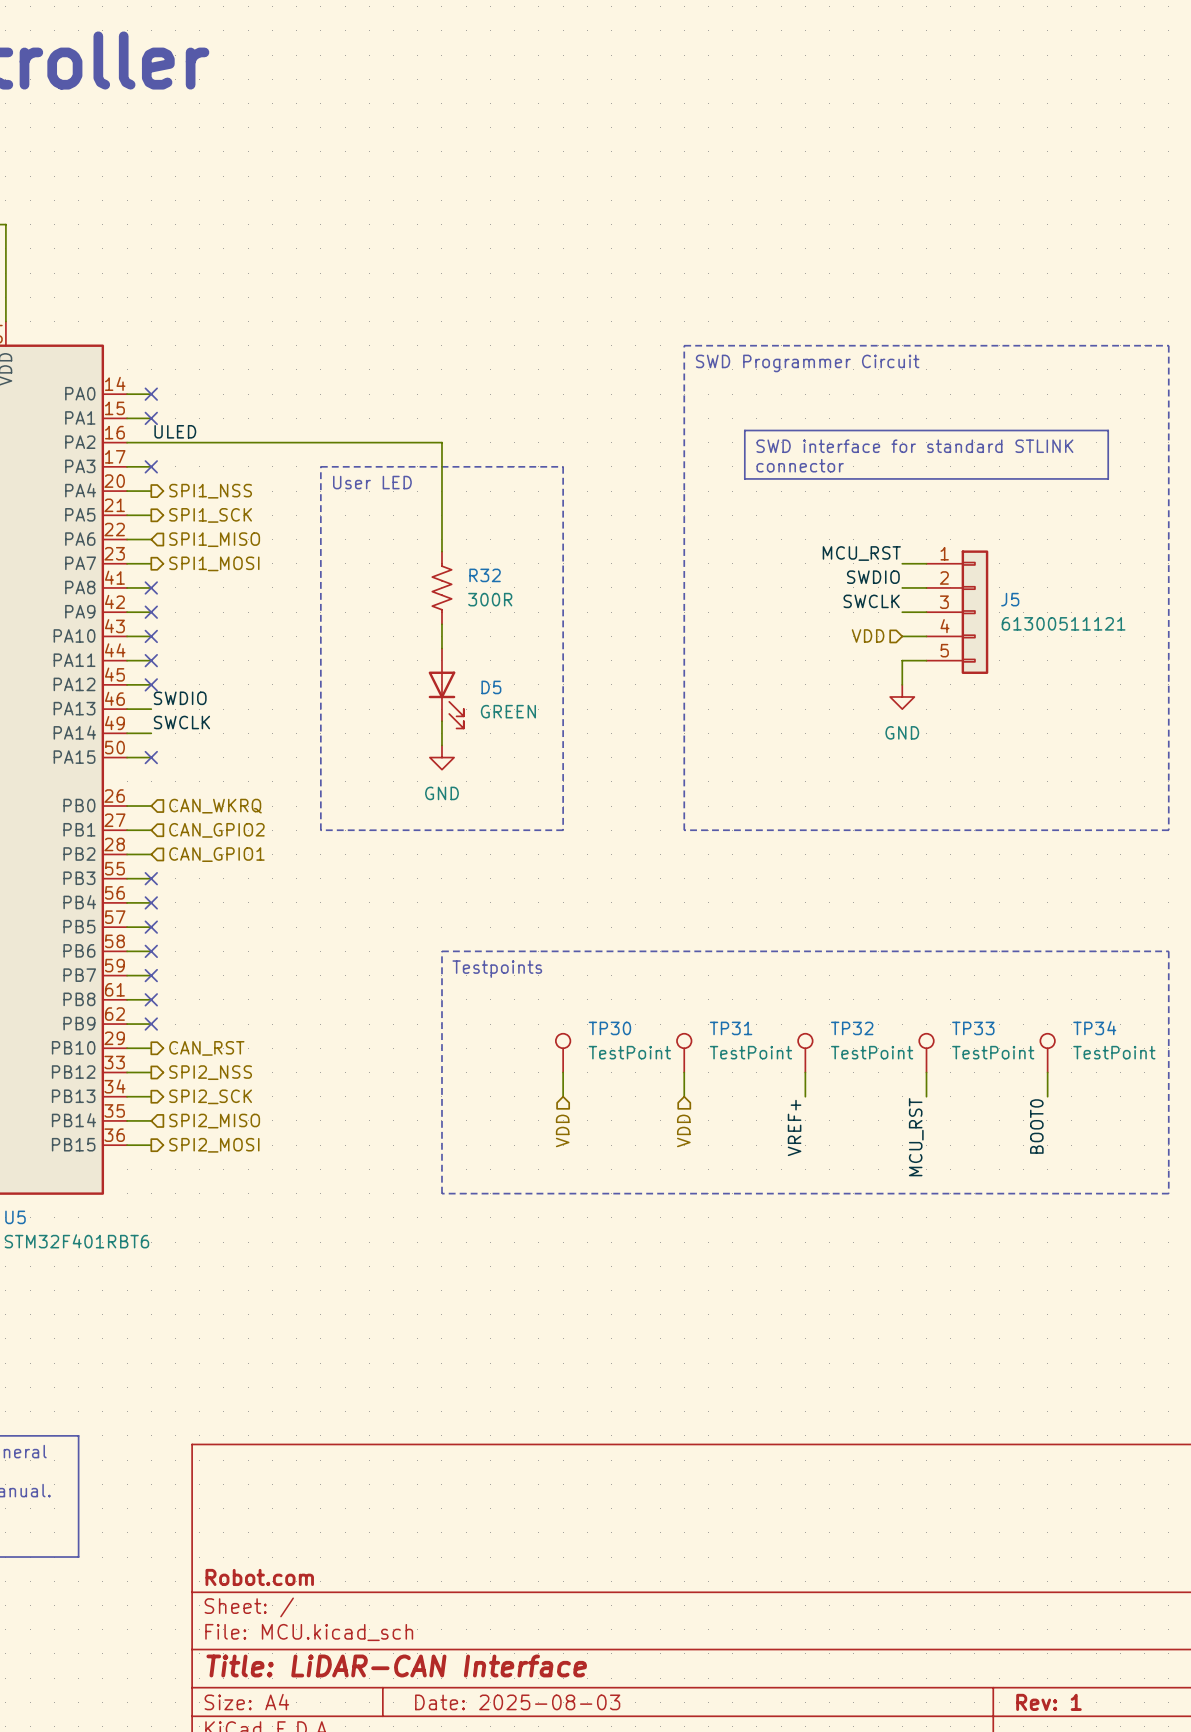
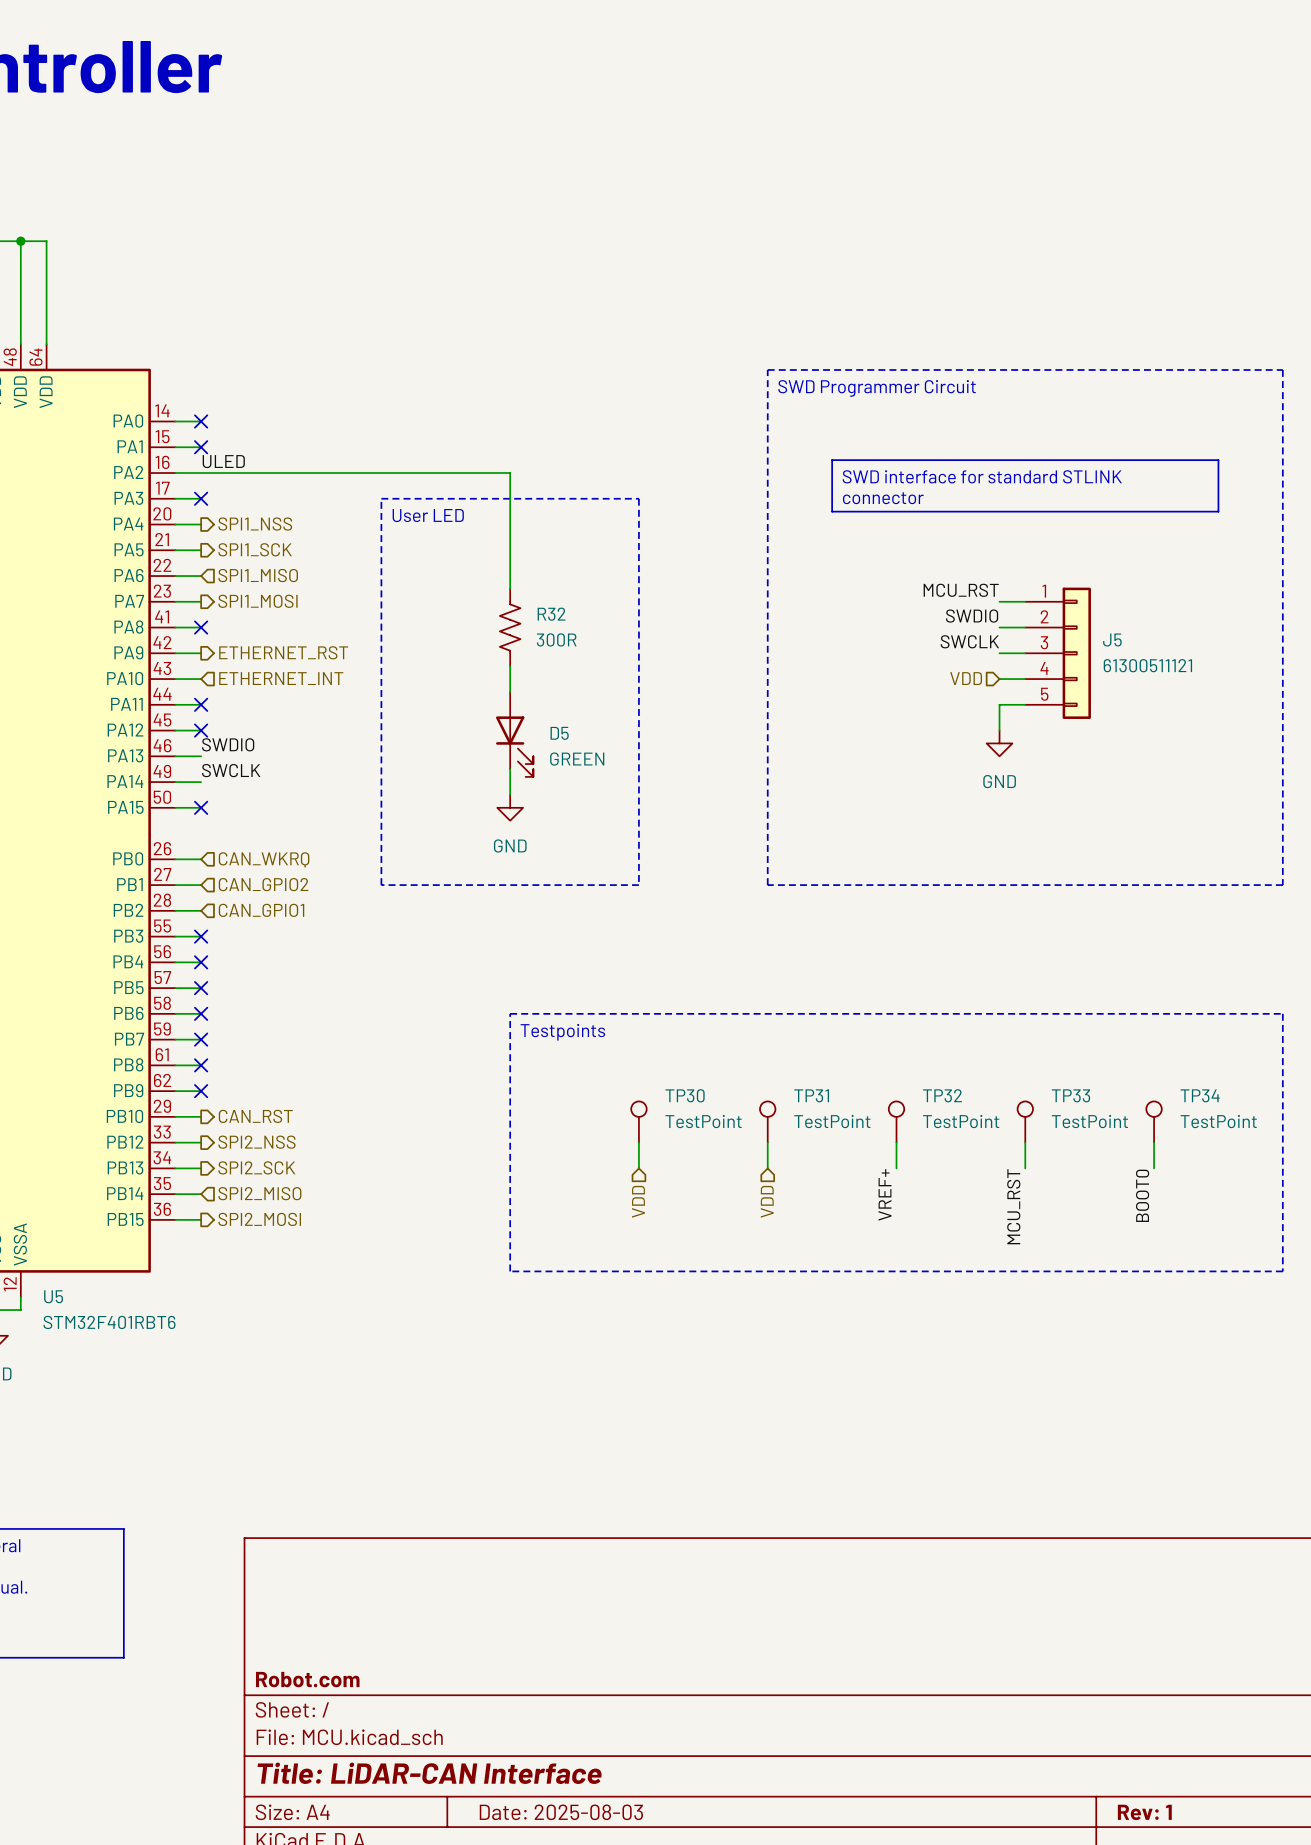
no-connect mark: (151, 612) -> none
hierarchical label: none -> ETHERNET_RST (283, 652)
no-connect mark: (151, 636) -> none
hierarchical label: none -> ETHERNET_INT (281, 678)

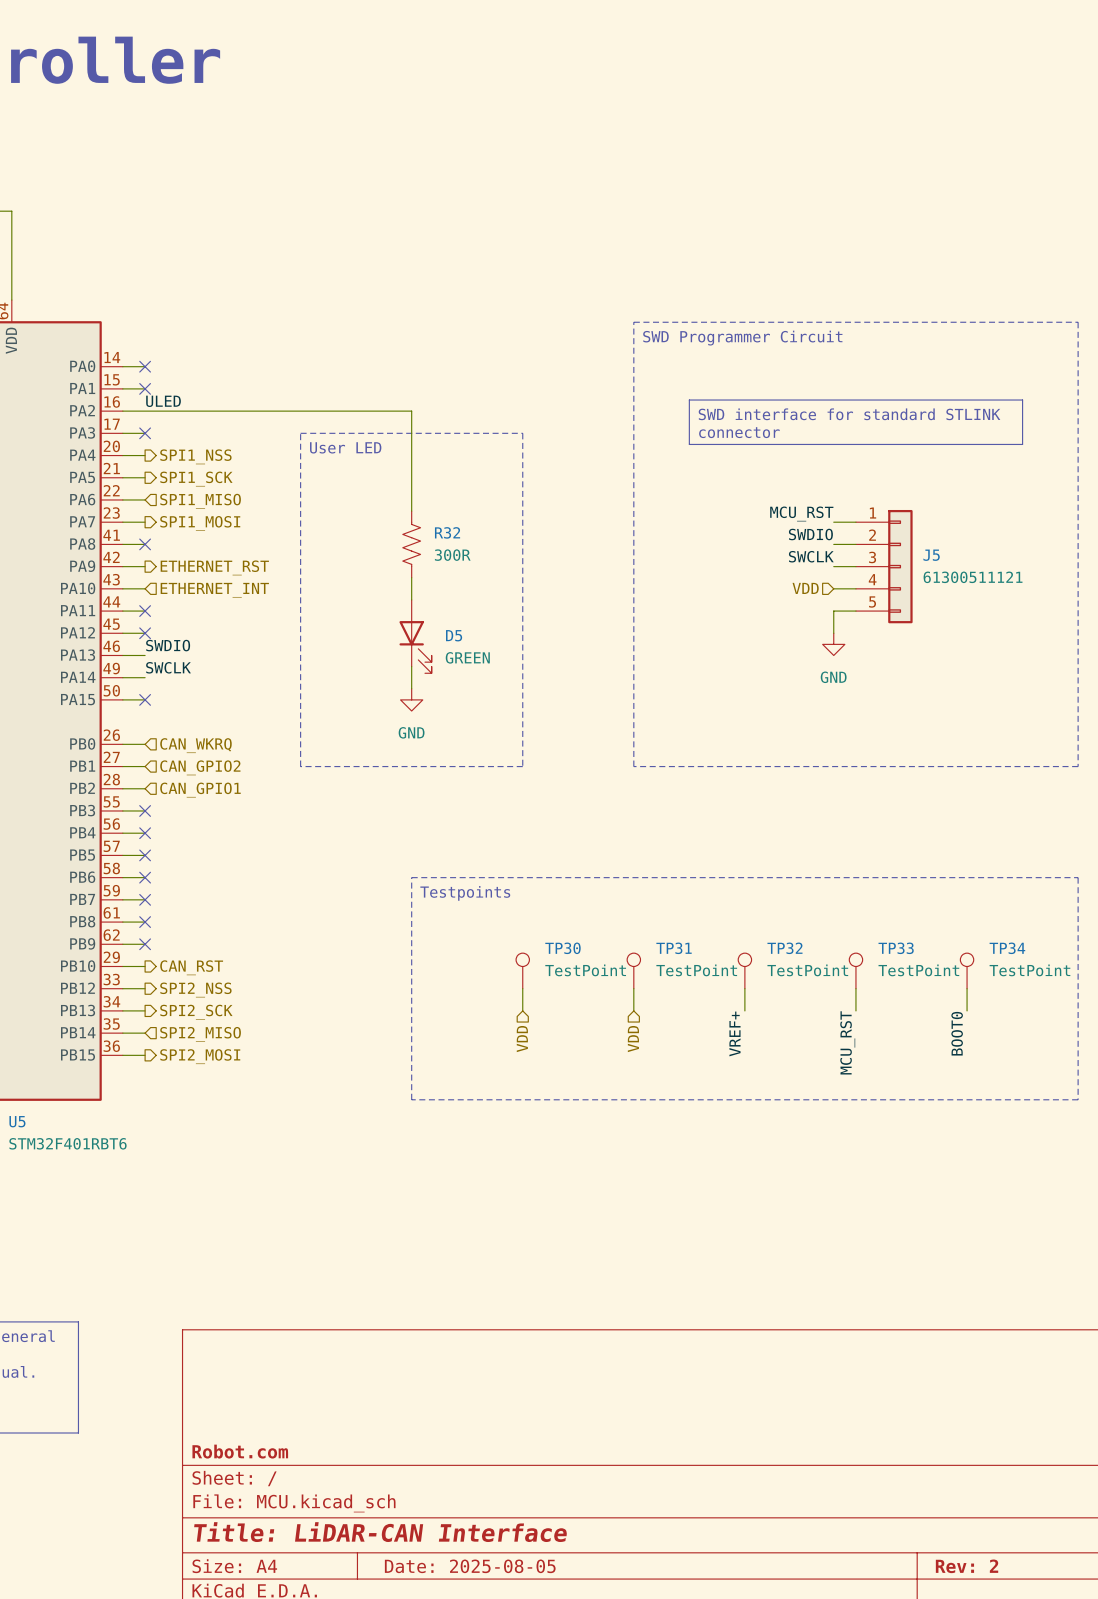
title block: Date: 2025-08-03 (561, 1812) -> Date: 2025-08-05 (470, 1566)
title block: Rev: 1 (1144, 1812) -> Rev: 2 (967, 1566)

